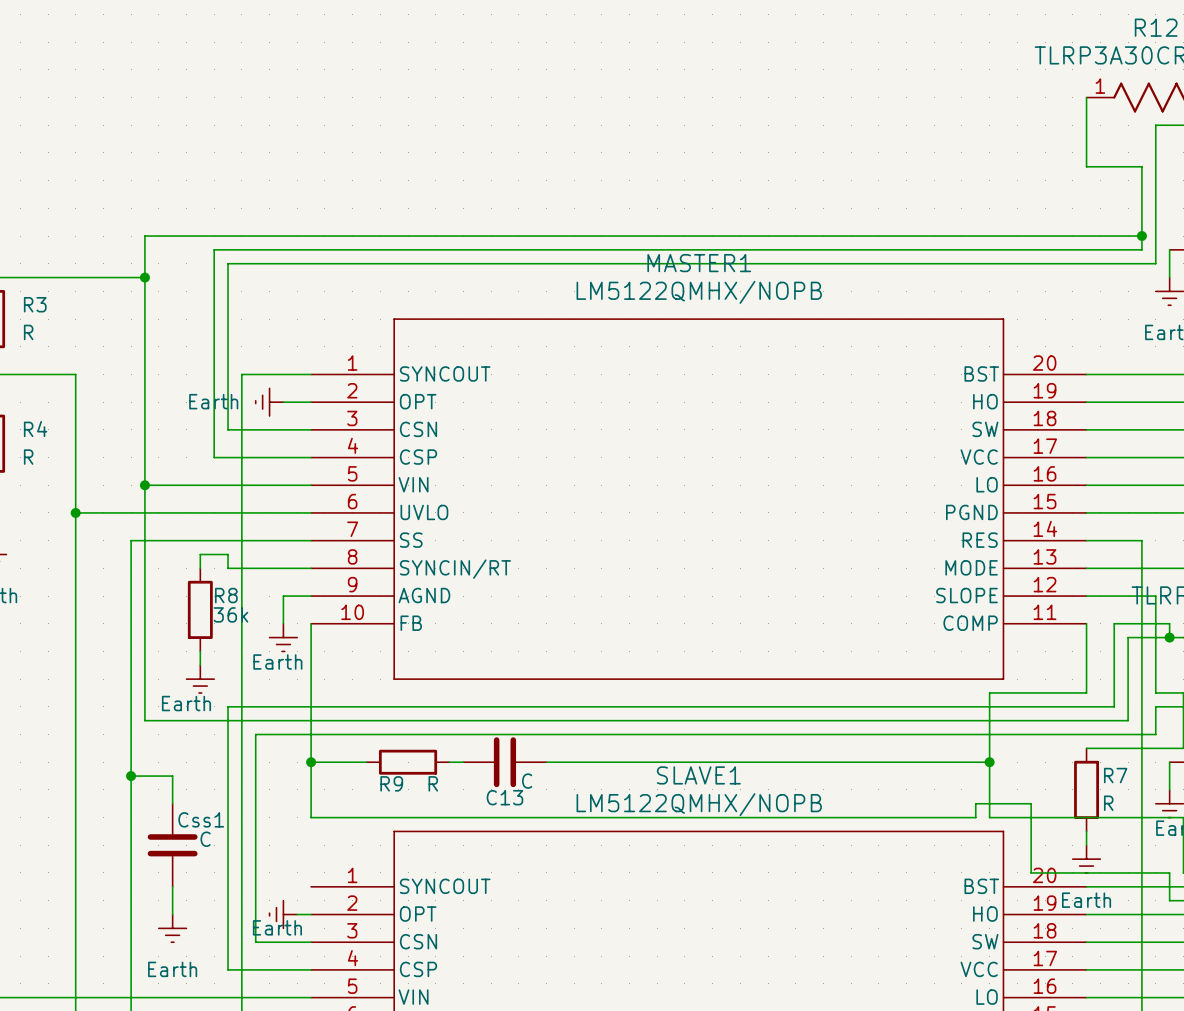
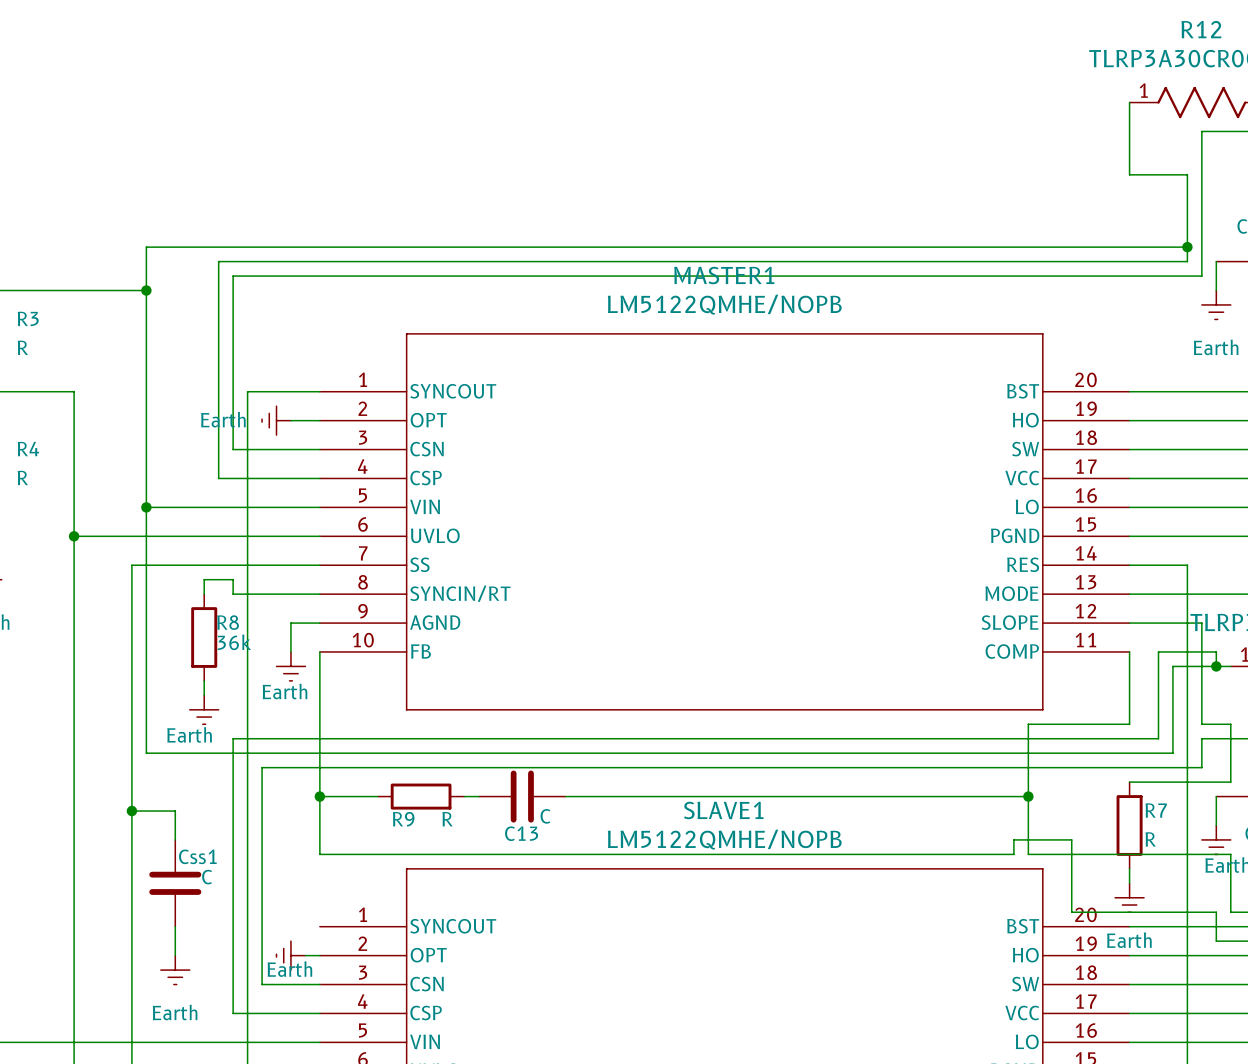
MASTER1 value: LM5122QMHX/NOPB (699, 292) -> LM5122QMHE/NOPB (724, 304)
SLAVE1 value: LM5122QMHX/NOPB (699, 804) -> LM5122QMHE/NOPB (724, 839)

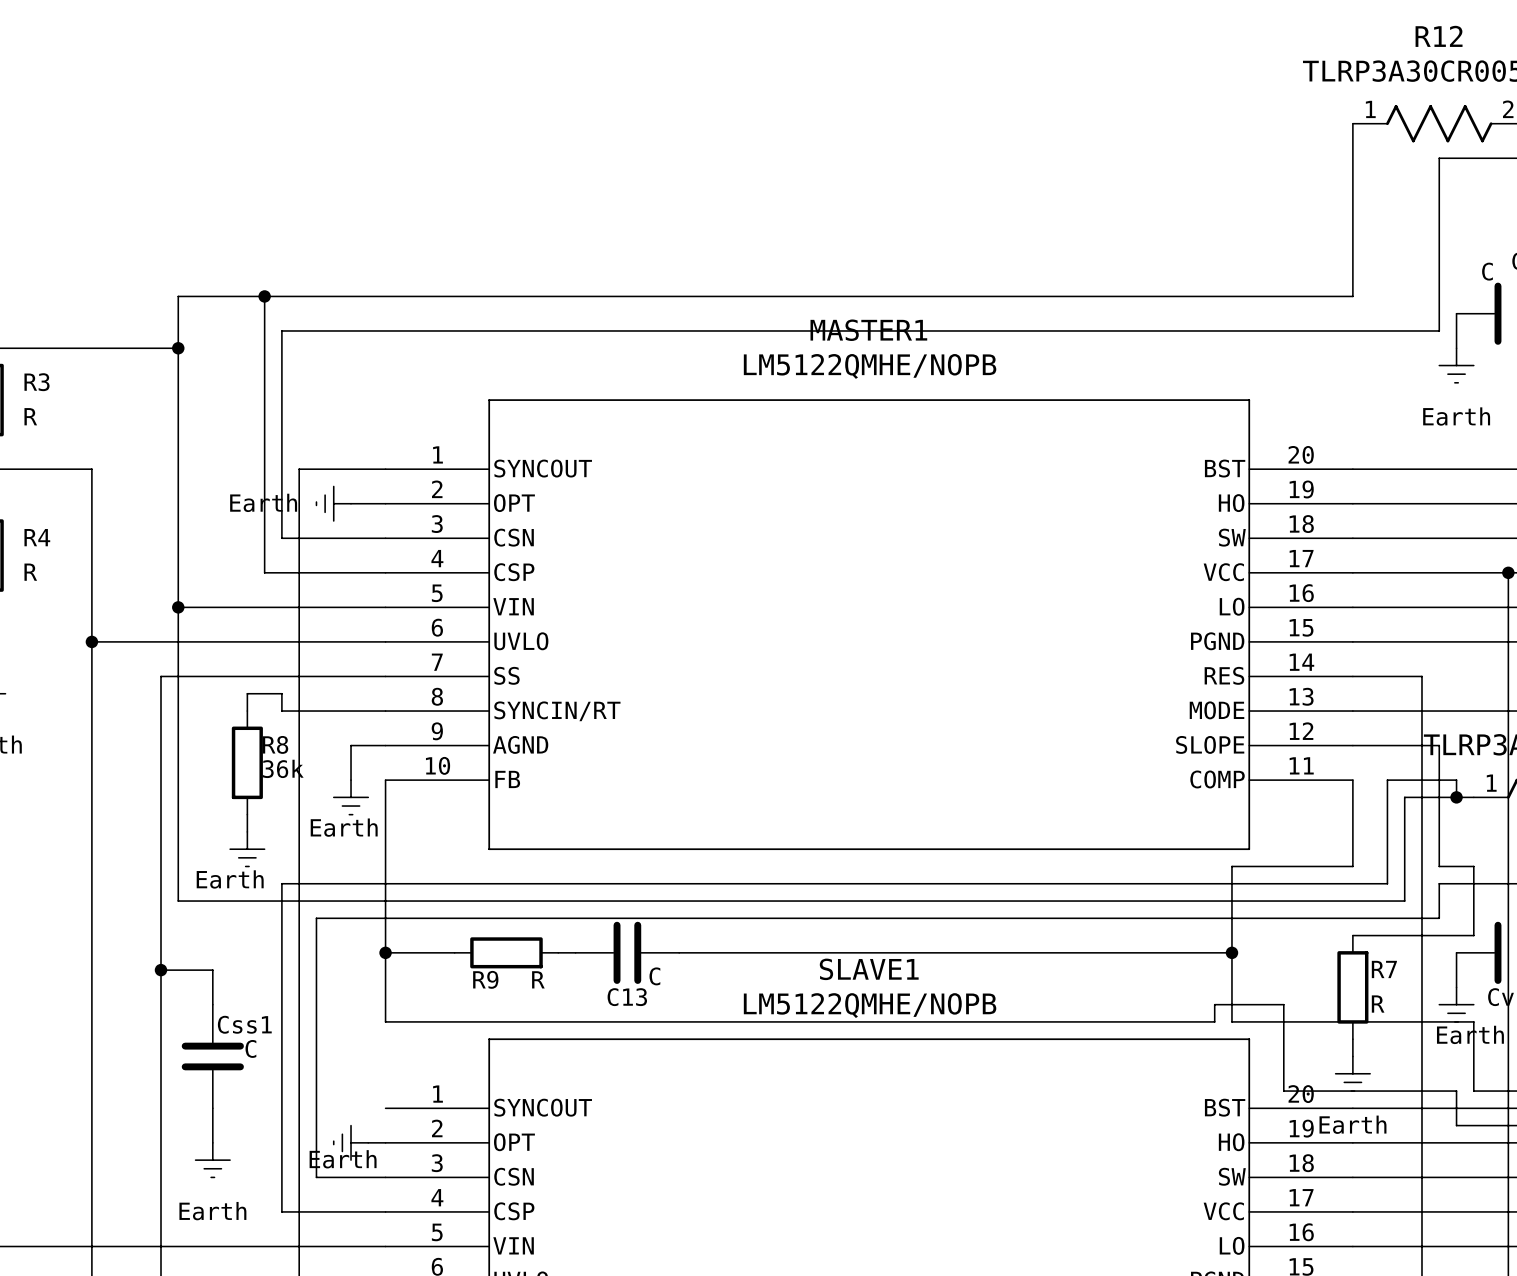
wire: (1129, 174) (1187, 174) (1187, 261) (218, 261) -> (264, 296) (264, 313)
junction: none -> (264, 296)
wire: (1129, 247) (1187, 247) -> (1352, 296) (1352, 210)
junction: (1187, 247) -> none

